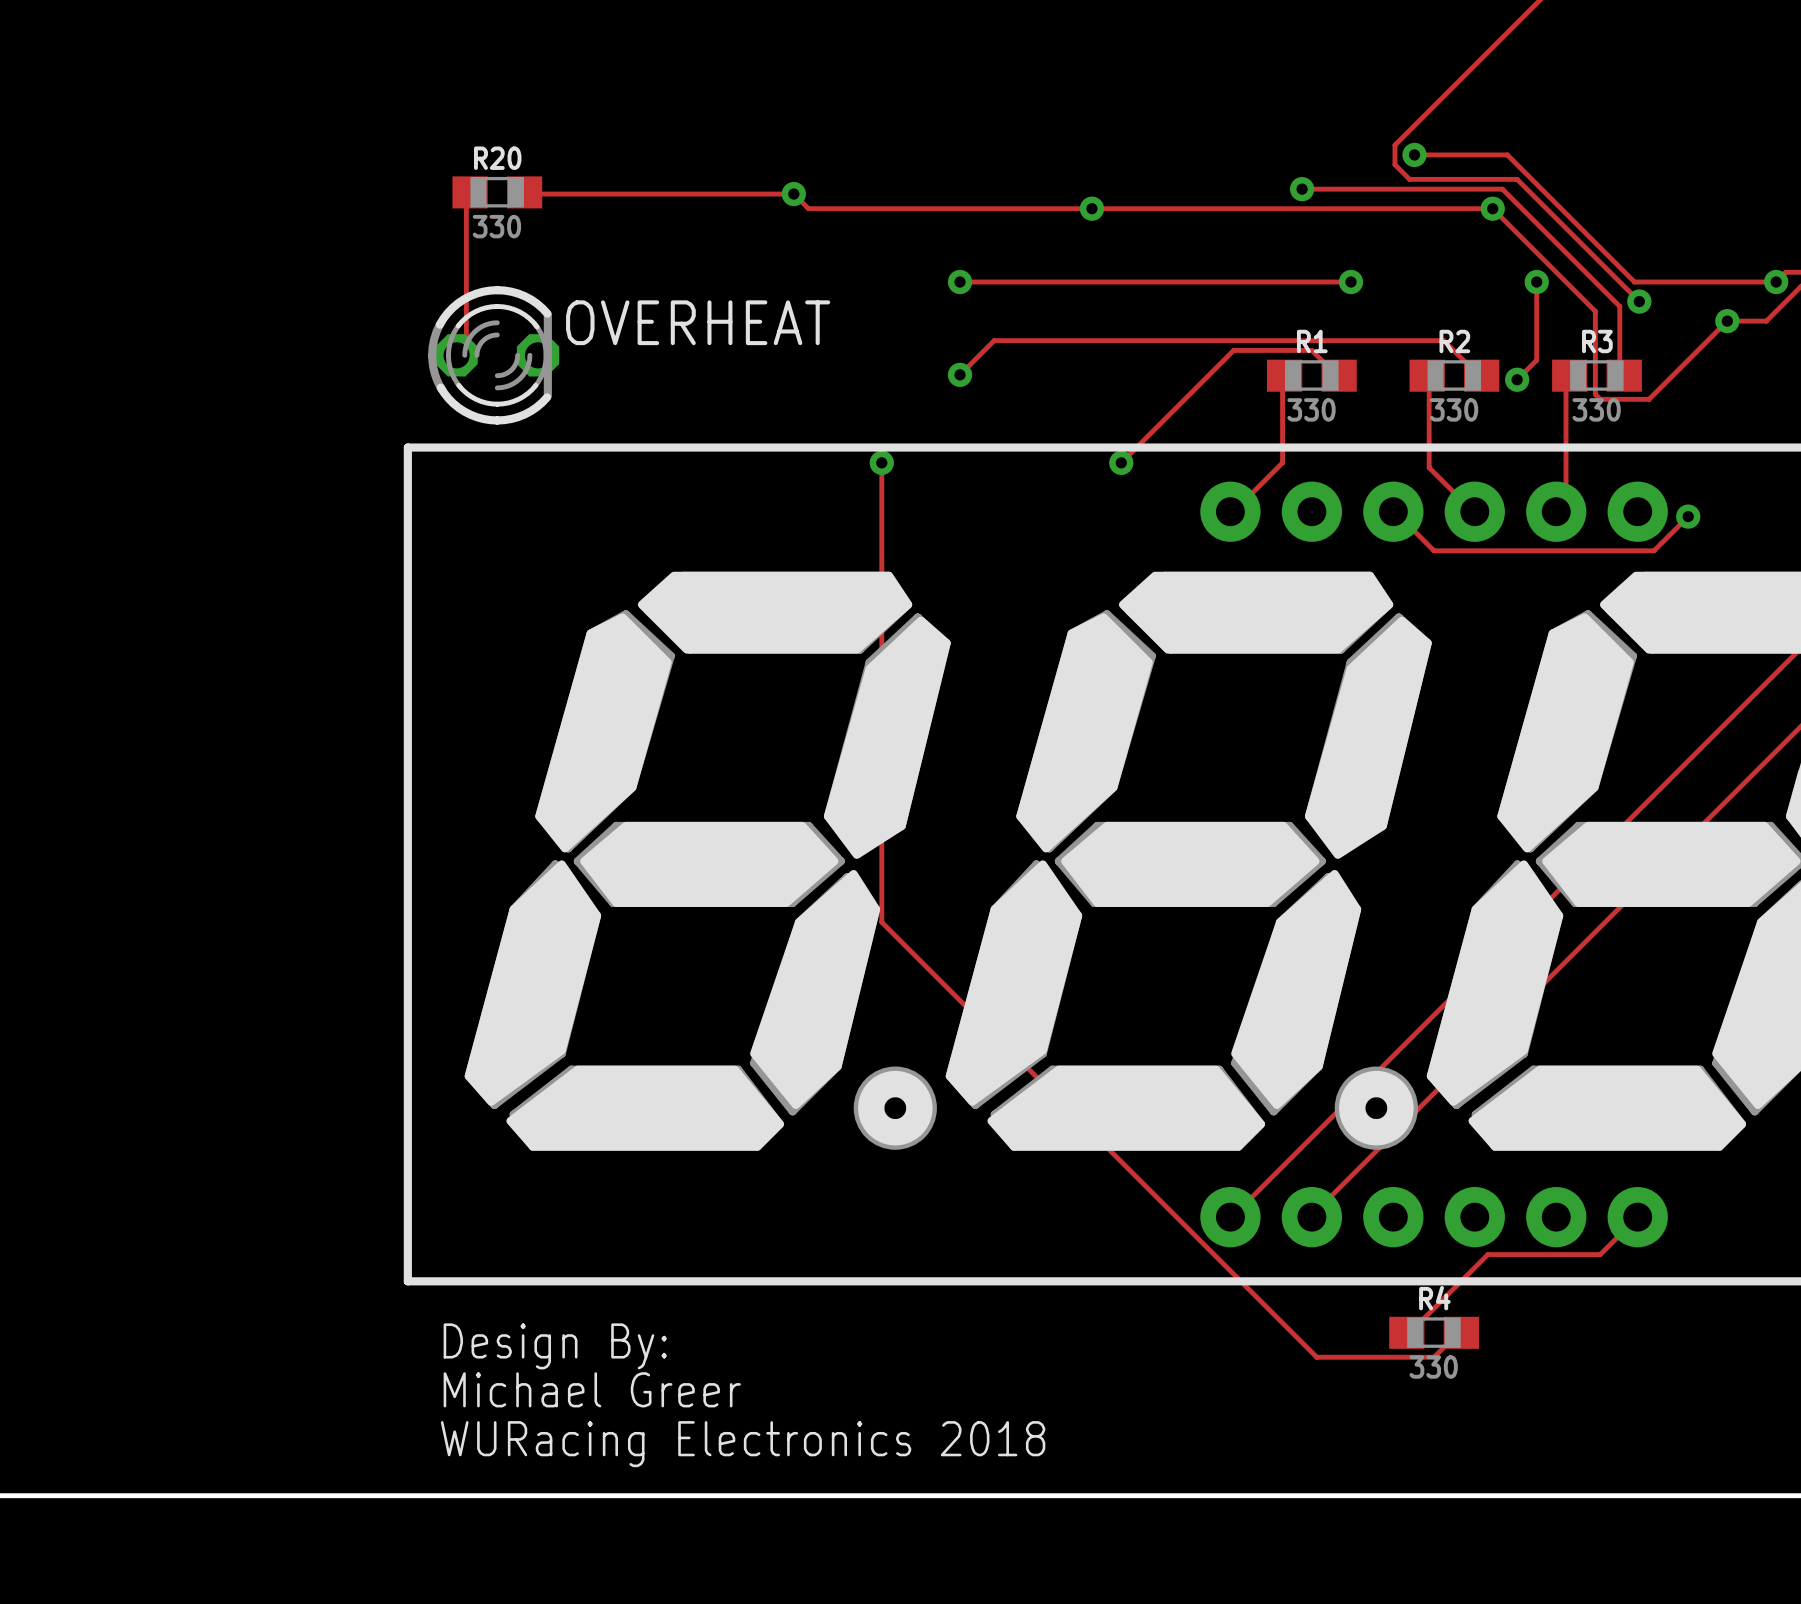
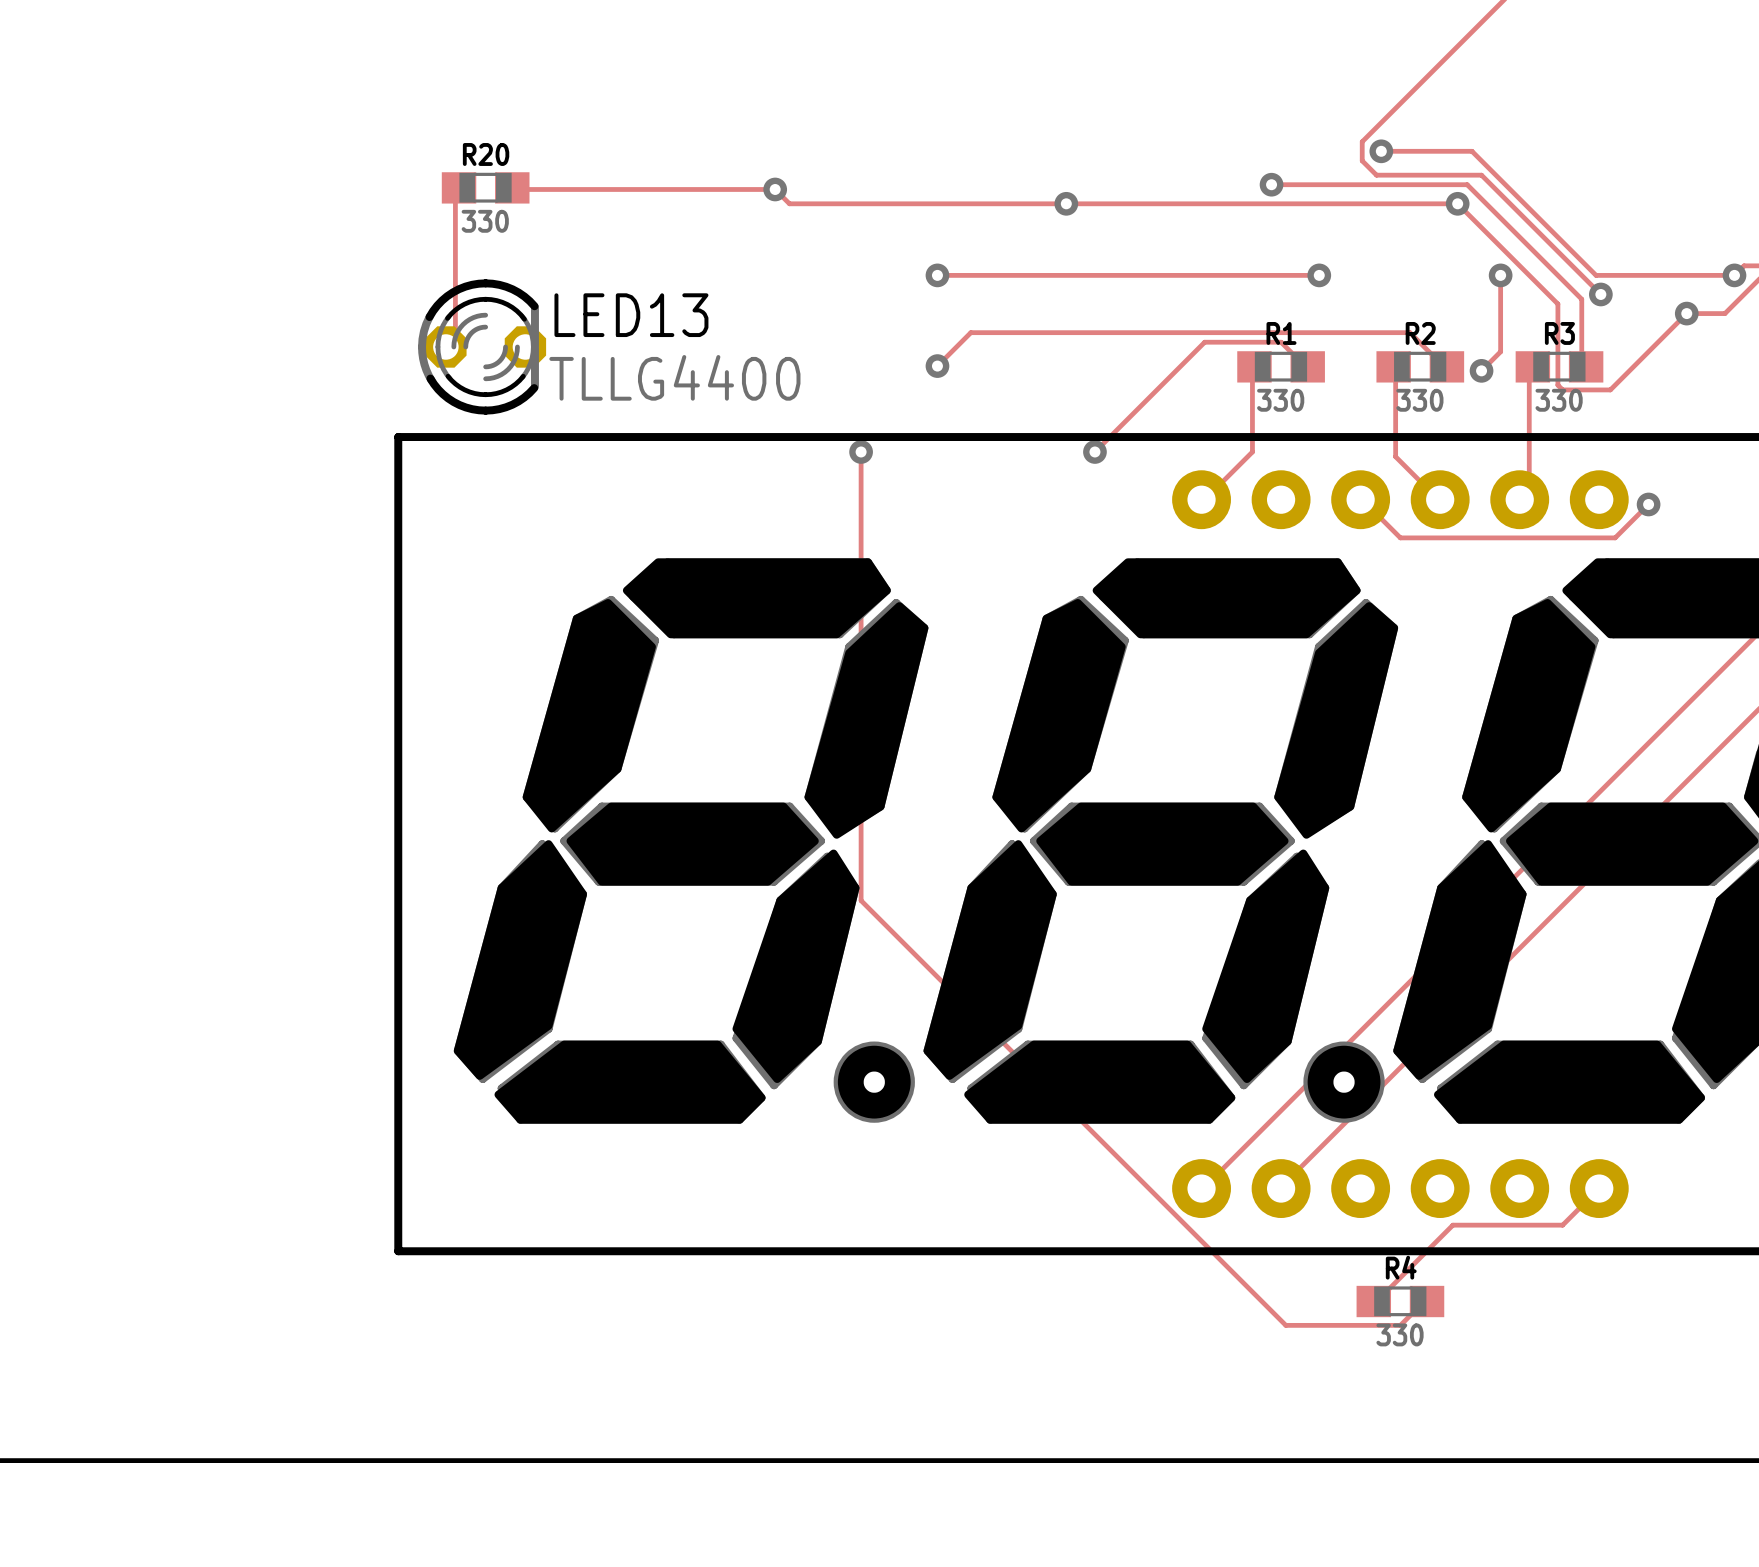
OVERHEAT name: OVERHEAT (698, 322) -> LED13 (631, 315)
OVERHEAT value: none -> TLLG4400 (674, 377)
text: Design By: (555, 1346) -> none
text: Michael Greer (592, 1389) -> none
text: WURacing Electronics 2018 (743, 1444) -> none

